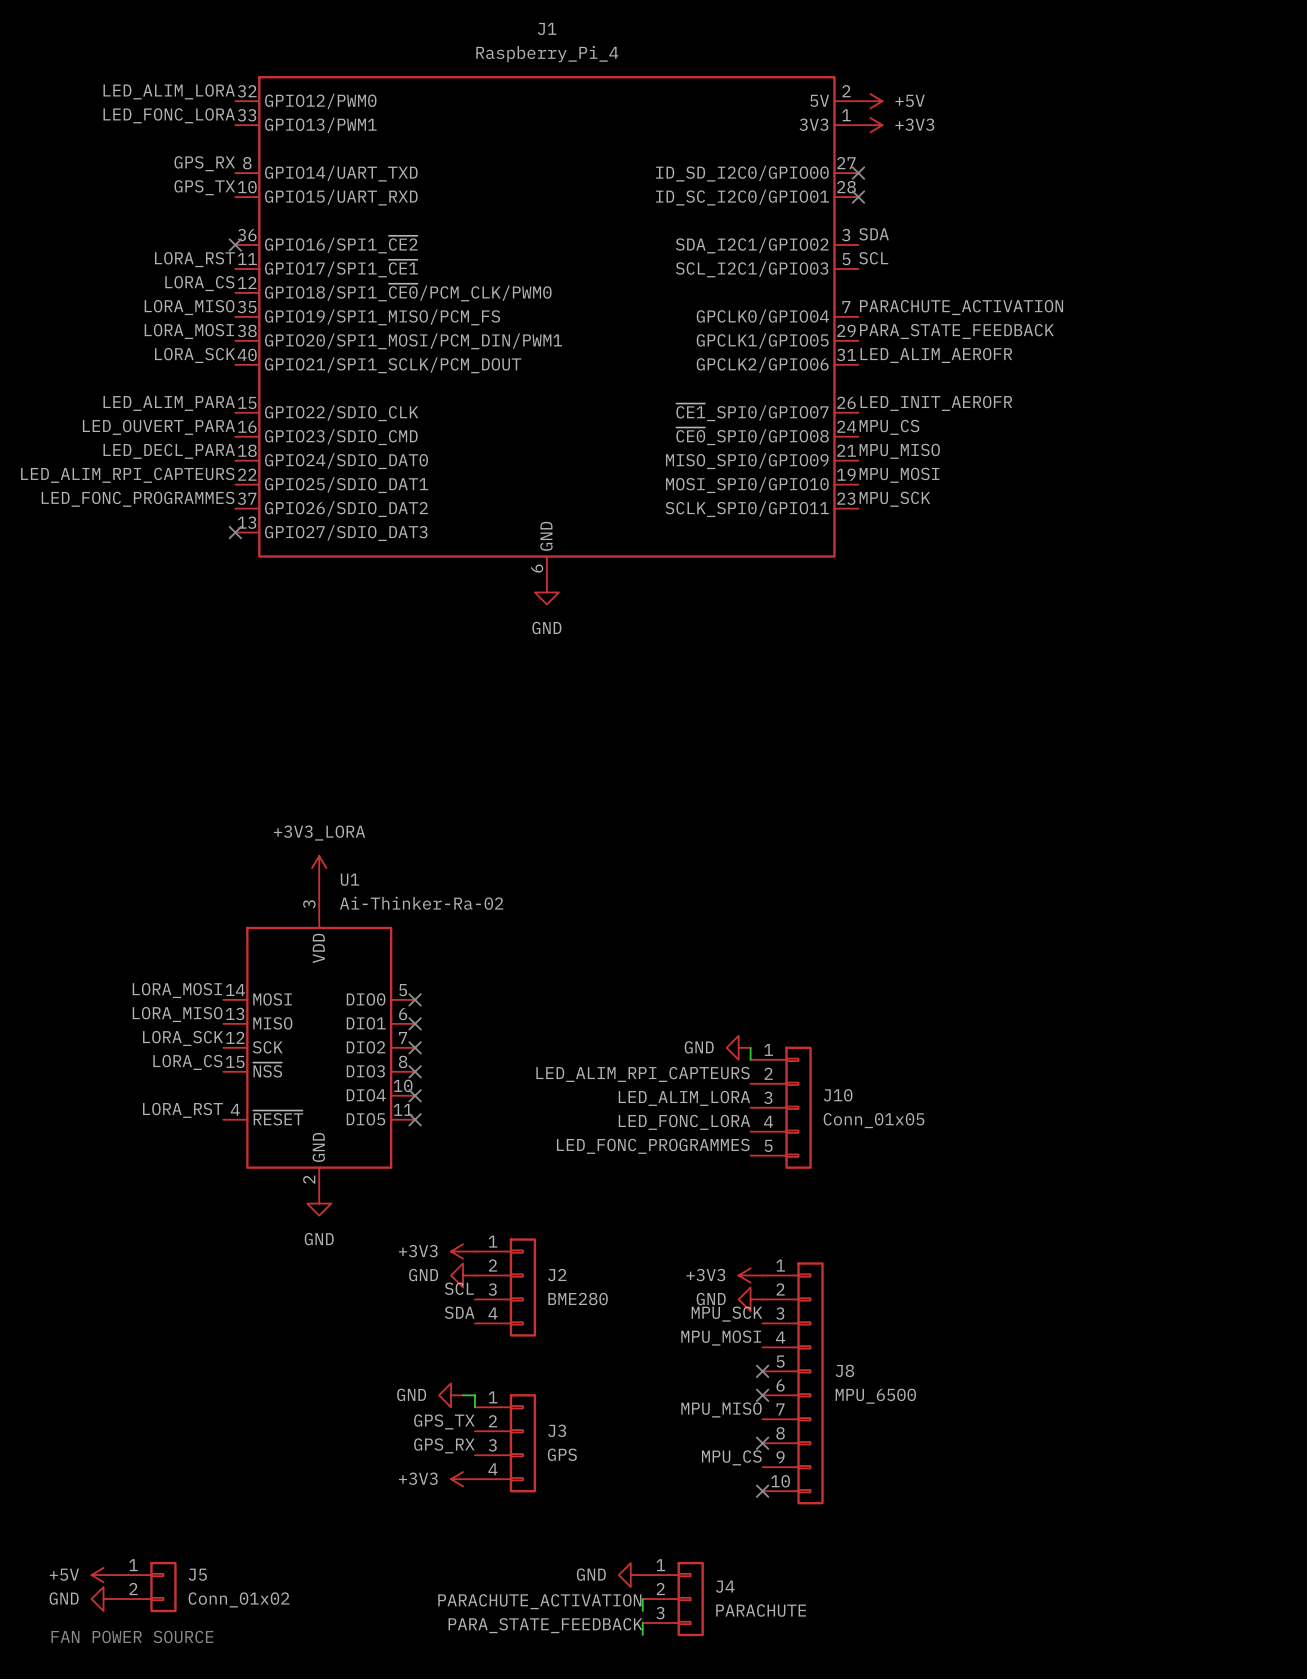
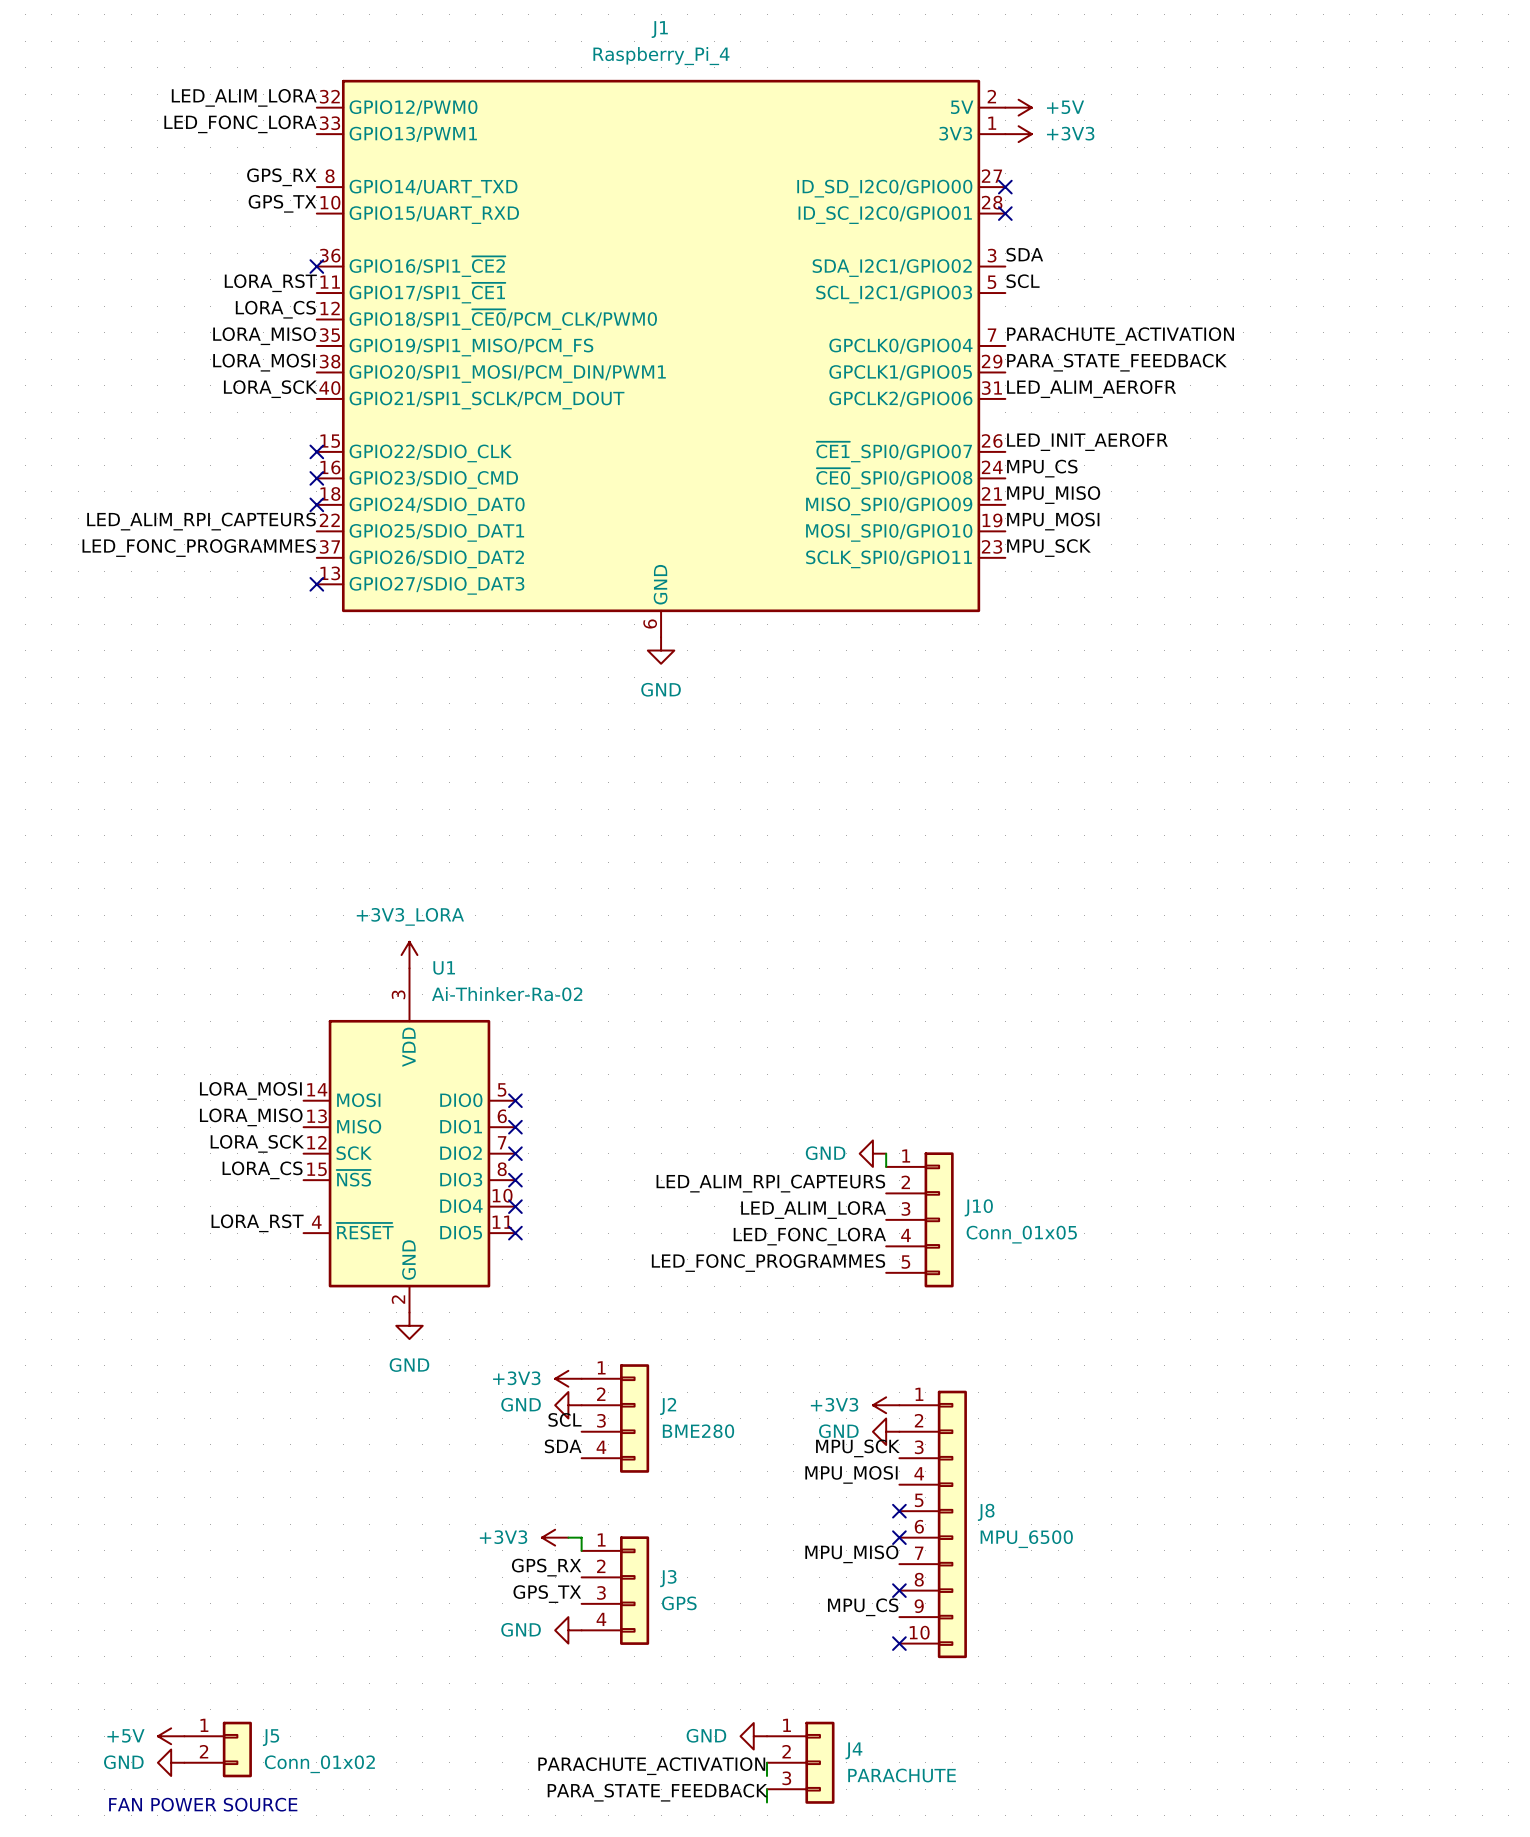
label: LED_ALIM_PARA (169, 403) -> none
no-connect mark: none -> (316, 451)
label: LED_OUVERT_PARA (158, 427) -> none
no-connect mark: none -> (316, 478)
label: LED_DECL_PARA (169, 451) -> none
no-connect mark: none -> (316, 504)
power symbol: GND (451, 1395) -> +3V3 (555, 1537)
label: GPS_TX (444, 1421) -> GPS_RX (546, 1567)
label: GPS_RX (444, 1445) -> GPS_TX (547, 1594)
power symbol: +3V3 (463, 1479) -> GND (568, 1630)

